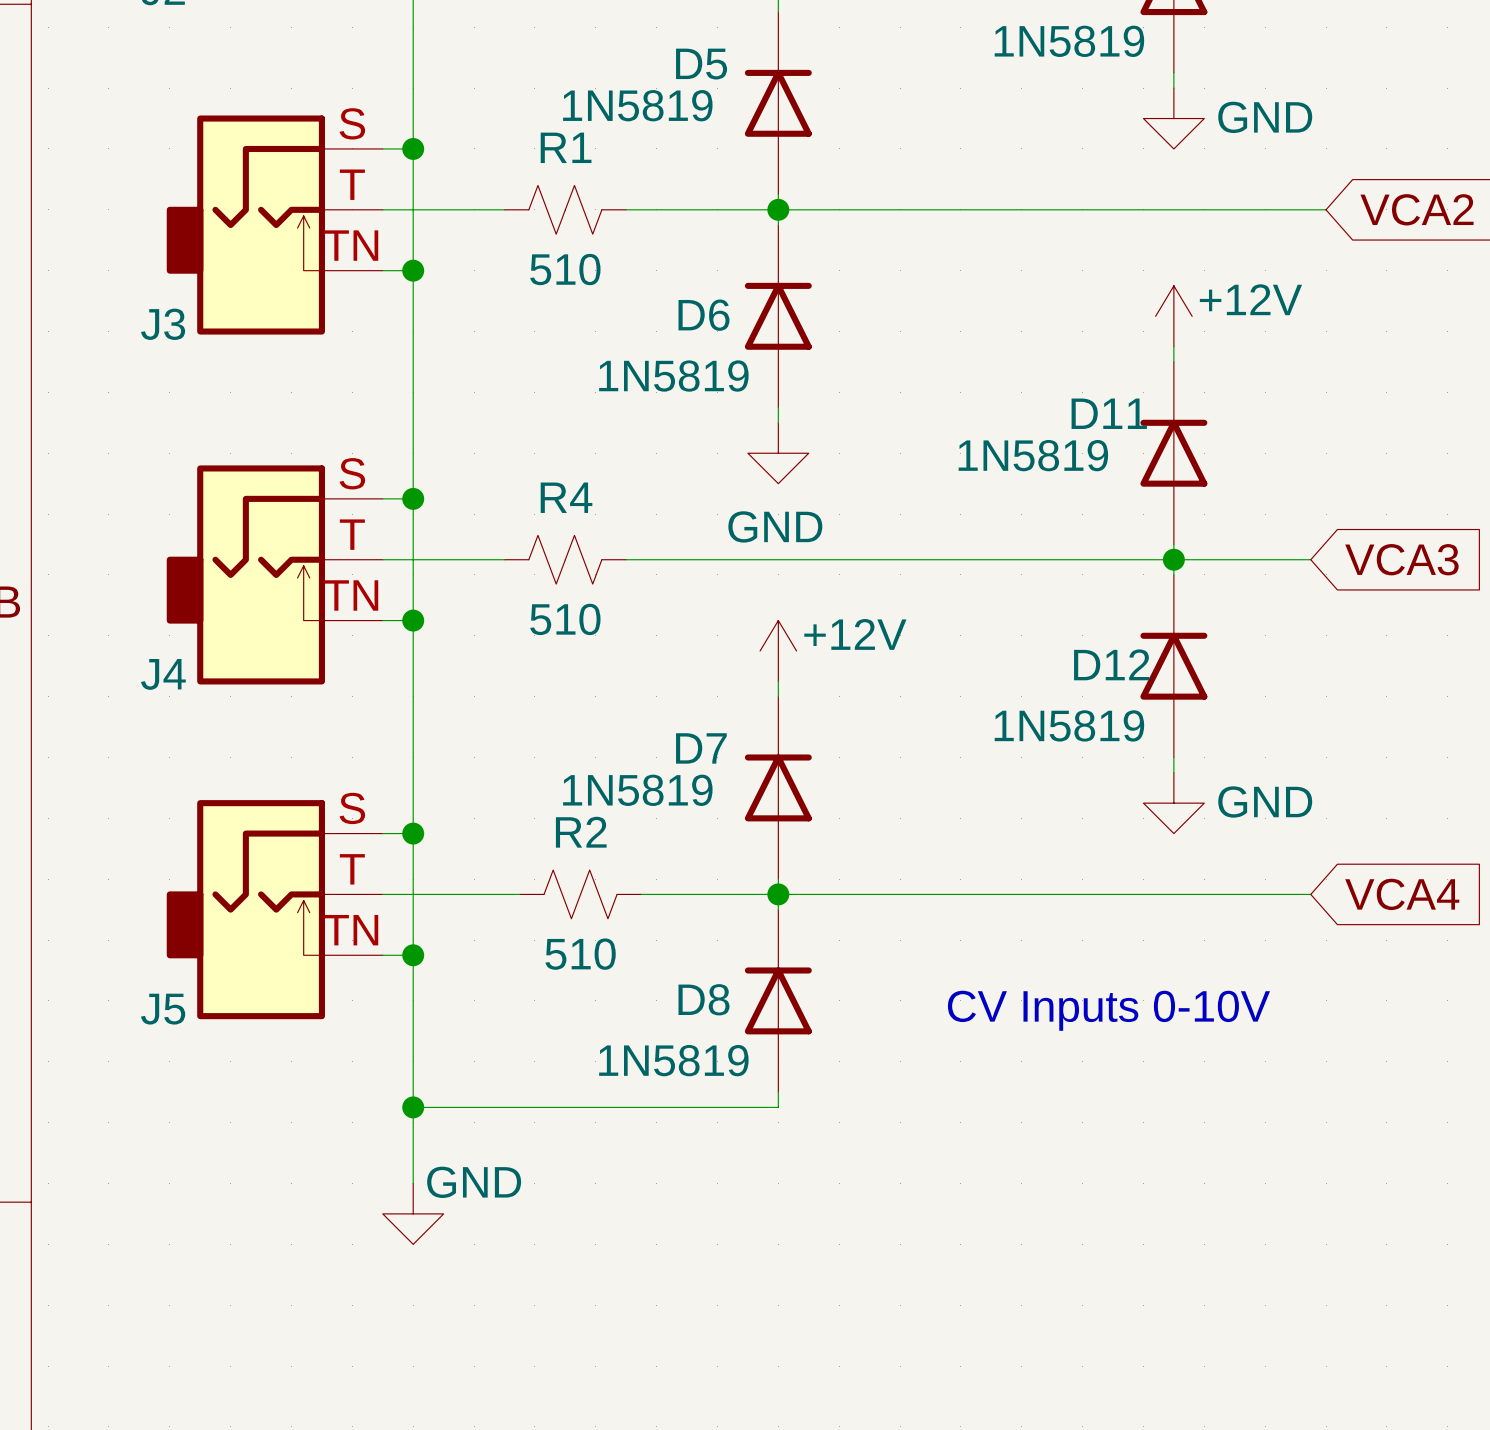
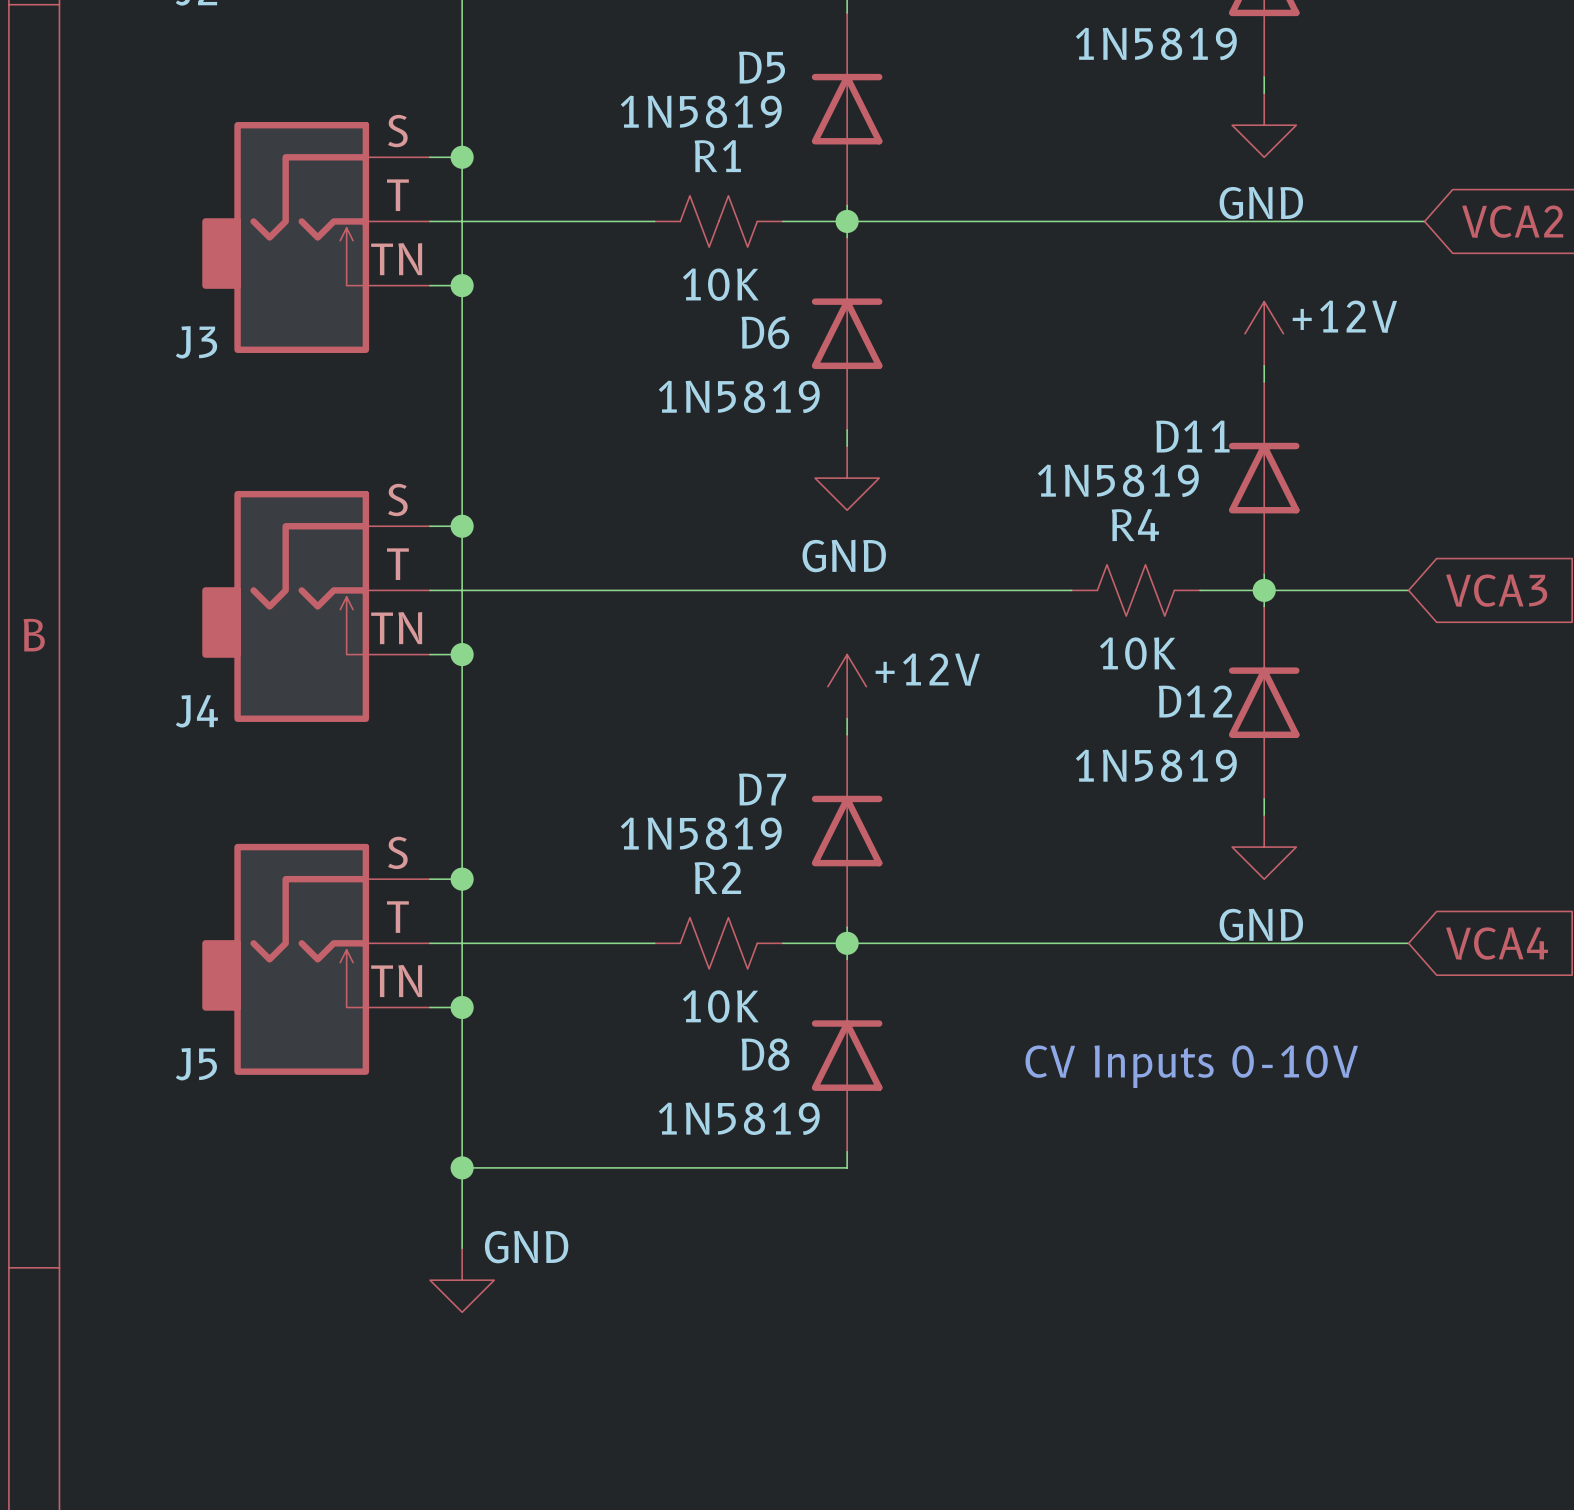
power symbol text position: GND (1265, 117) -> GND (1261, 203)
R1 position: (565, 209) -> (718, 221)
wire: (626, 209) (717, 209) -> (558, 221) (654, 221)
R1 value: 510 (565, 269) -> 10K (720, 284)
R4 position: (565, 559) -> (1135, 590)
wire: (991, 559) (1113, 559) -> (558, 590) (686, 590)
R4 value: 510 (565, 619) -> 10K (1137, 653)
power symbol text position: GND (1265, 801) -> GND (1261, 924)
R2 position: (580, 894) -> (718, 943)
wire: (641, 894) (717, 894) -> (574, 943) (654, 943)
R2 value: 510 (580, 954) -> 10K (720, 1006)

